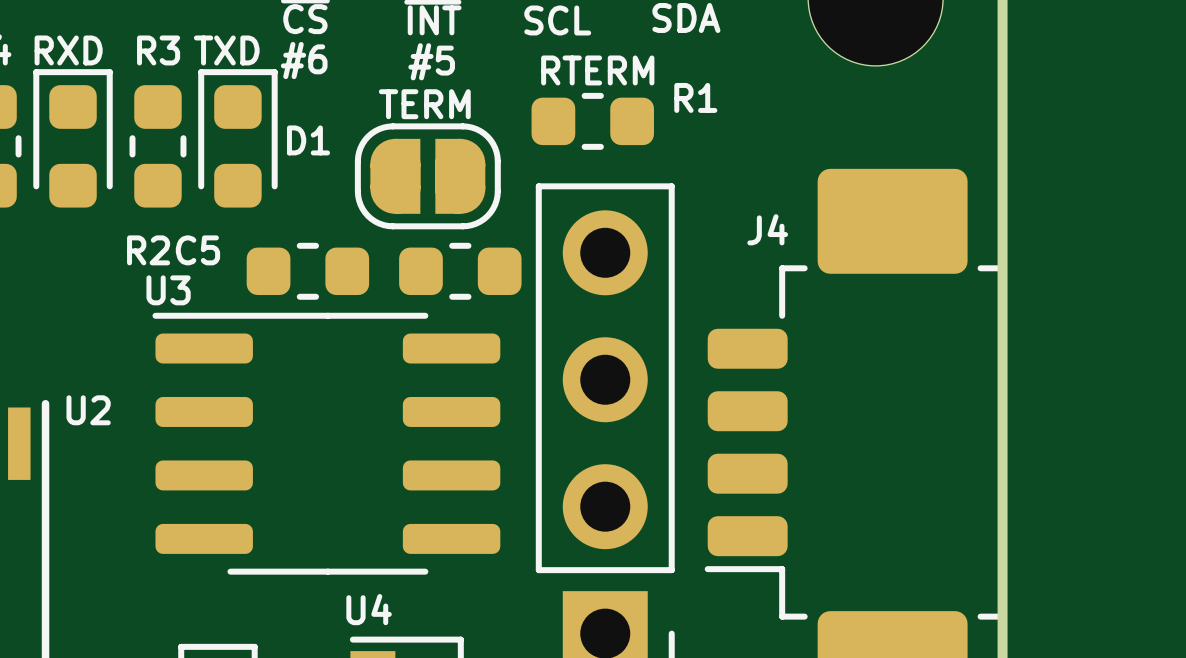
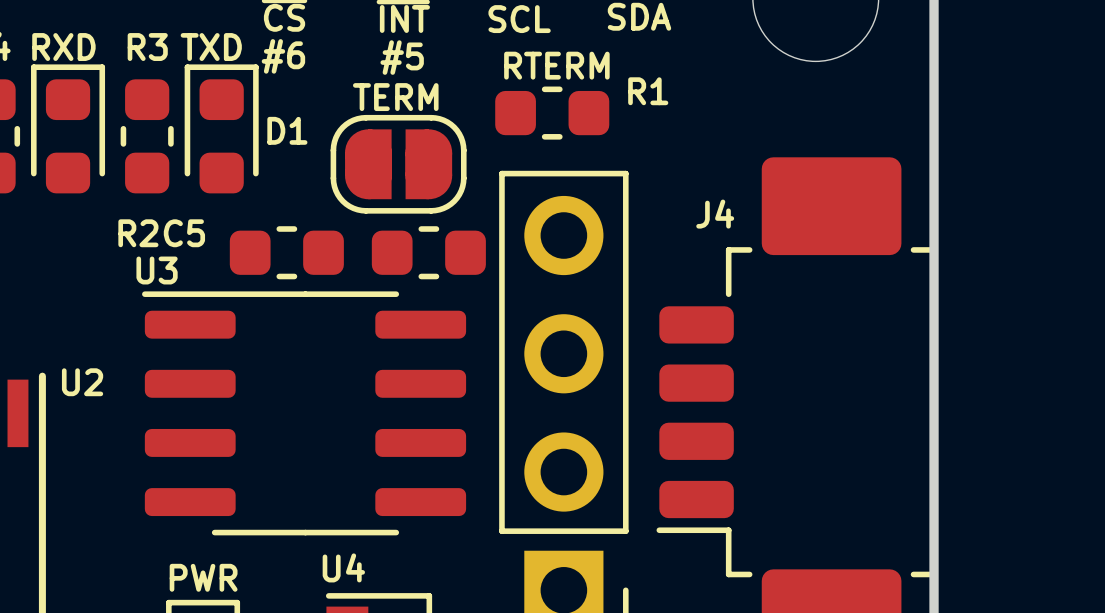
part value: none -> PWR (203, 577)

